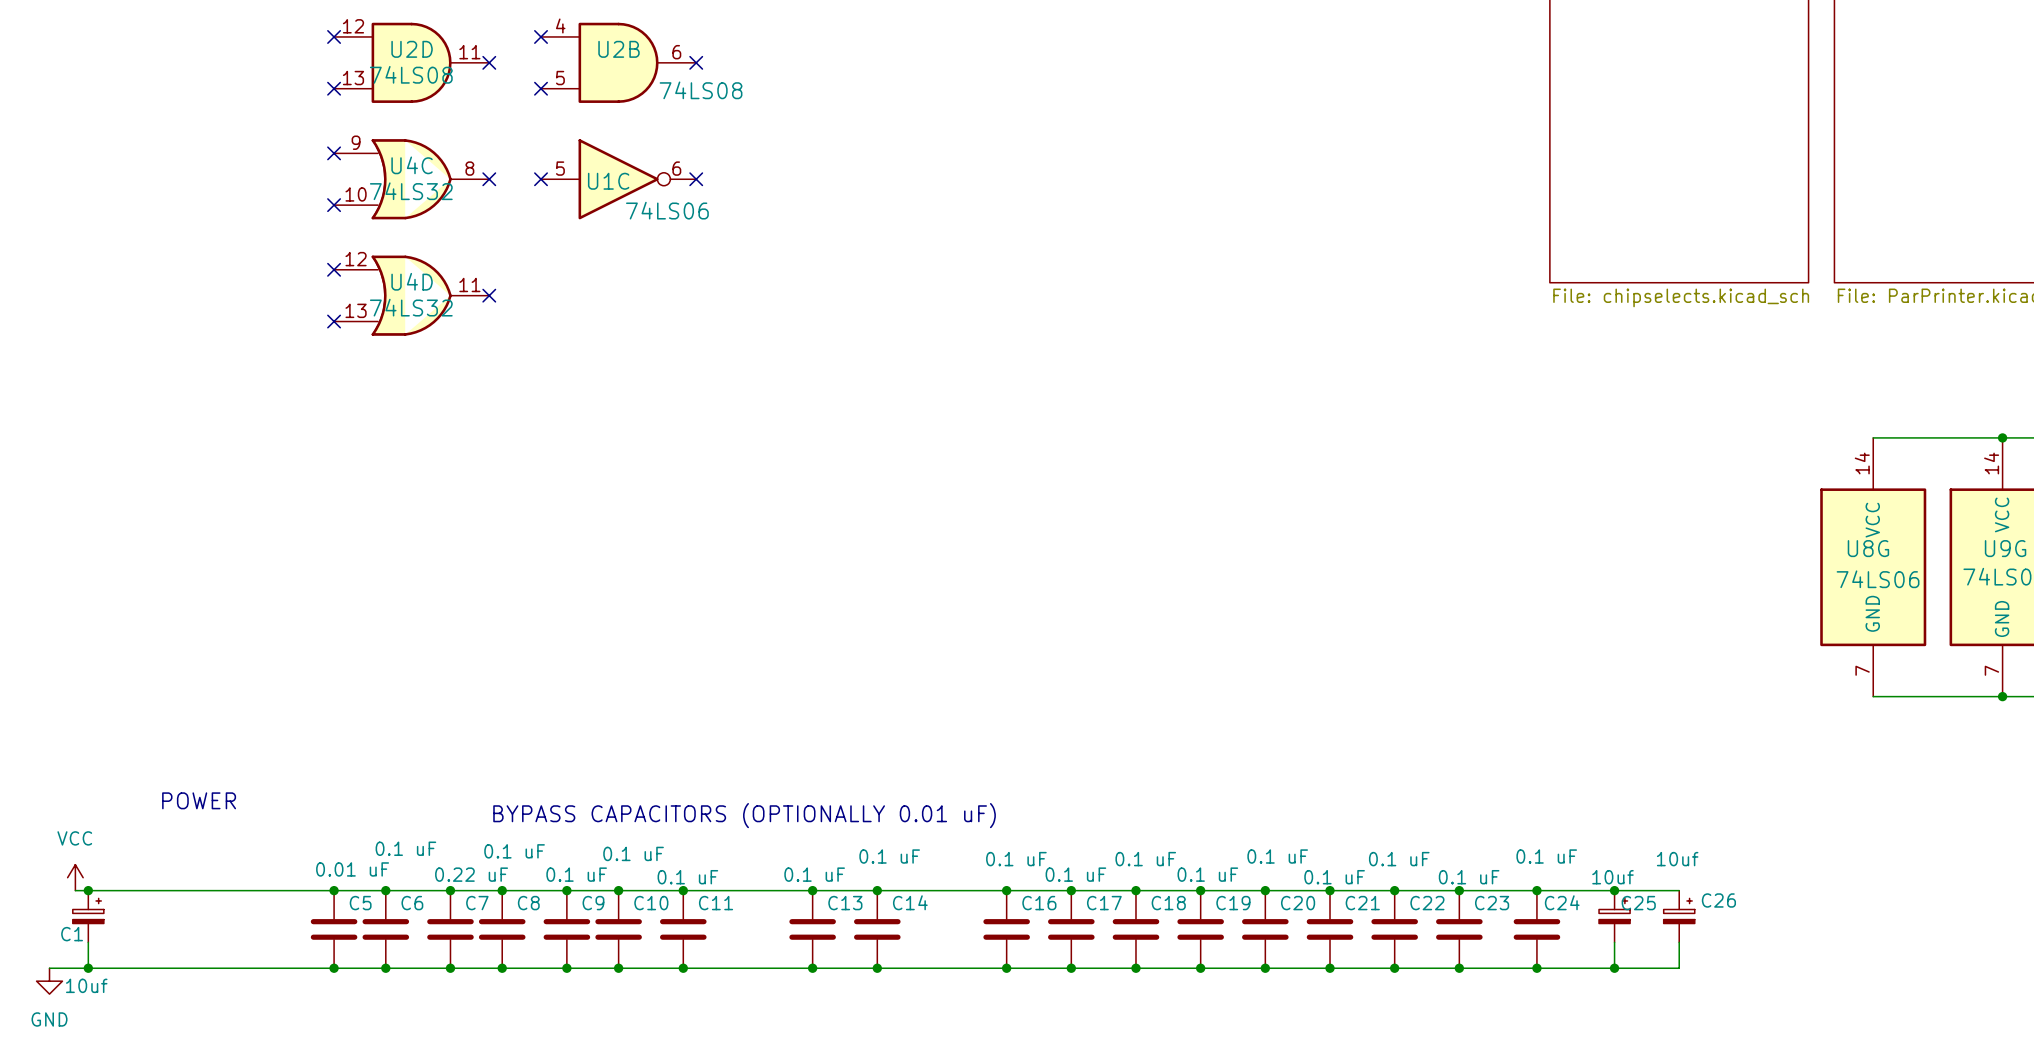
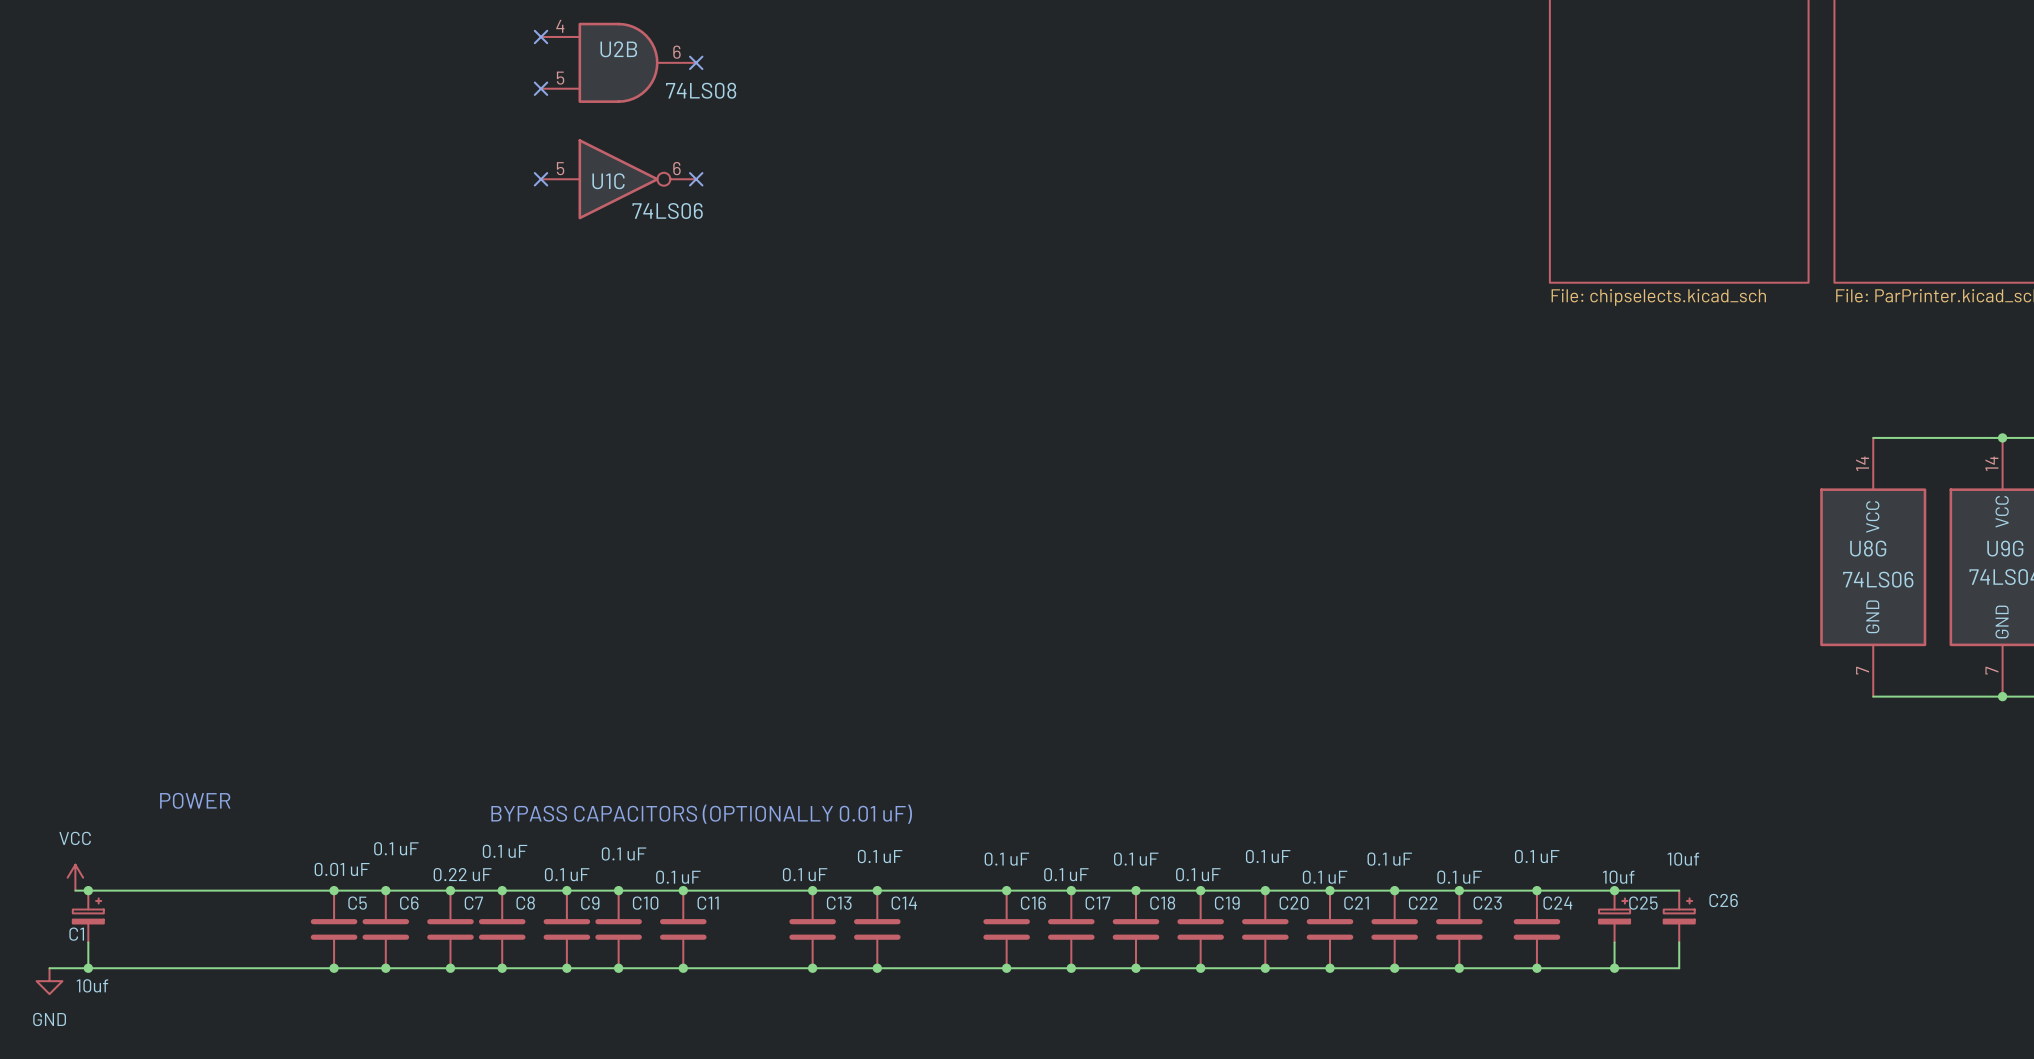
no-connect mark: (334, 36) -> none
U2D: 74LS08 (411, 62) -> none
no-connect mark: (489, 62) -> none
no-connect mark: (334, 88) -> none
no-connect mark: (334, 153) -> none
U4C: 74LS32 (411, 179) -> none
no-connect mark: (489, 179) -> none
no-connect mark: (334, 205) -> none
no-connect mark: (334, 269) -> none
U4D: 74LS32 (411, 295) -> none
no-connect mark: (489, 295) -> none
no-connect mark: (334, 321) -> none

